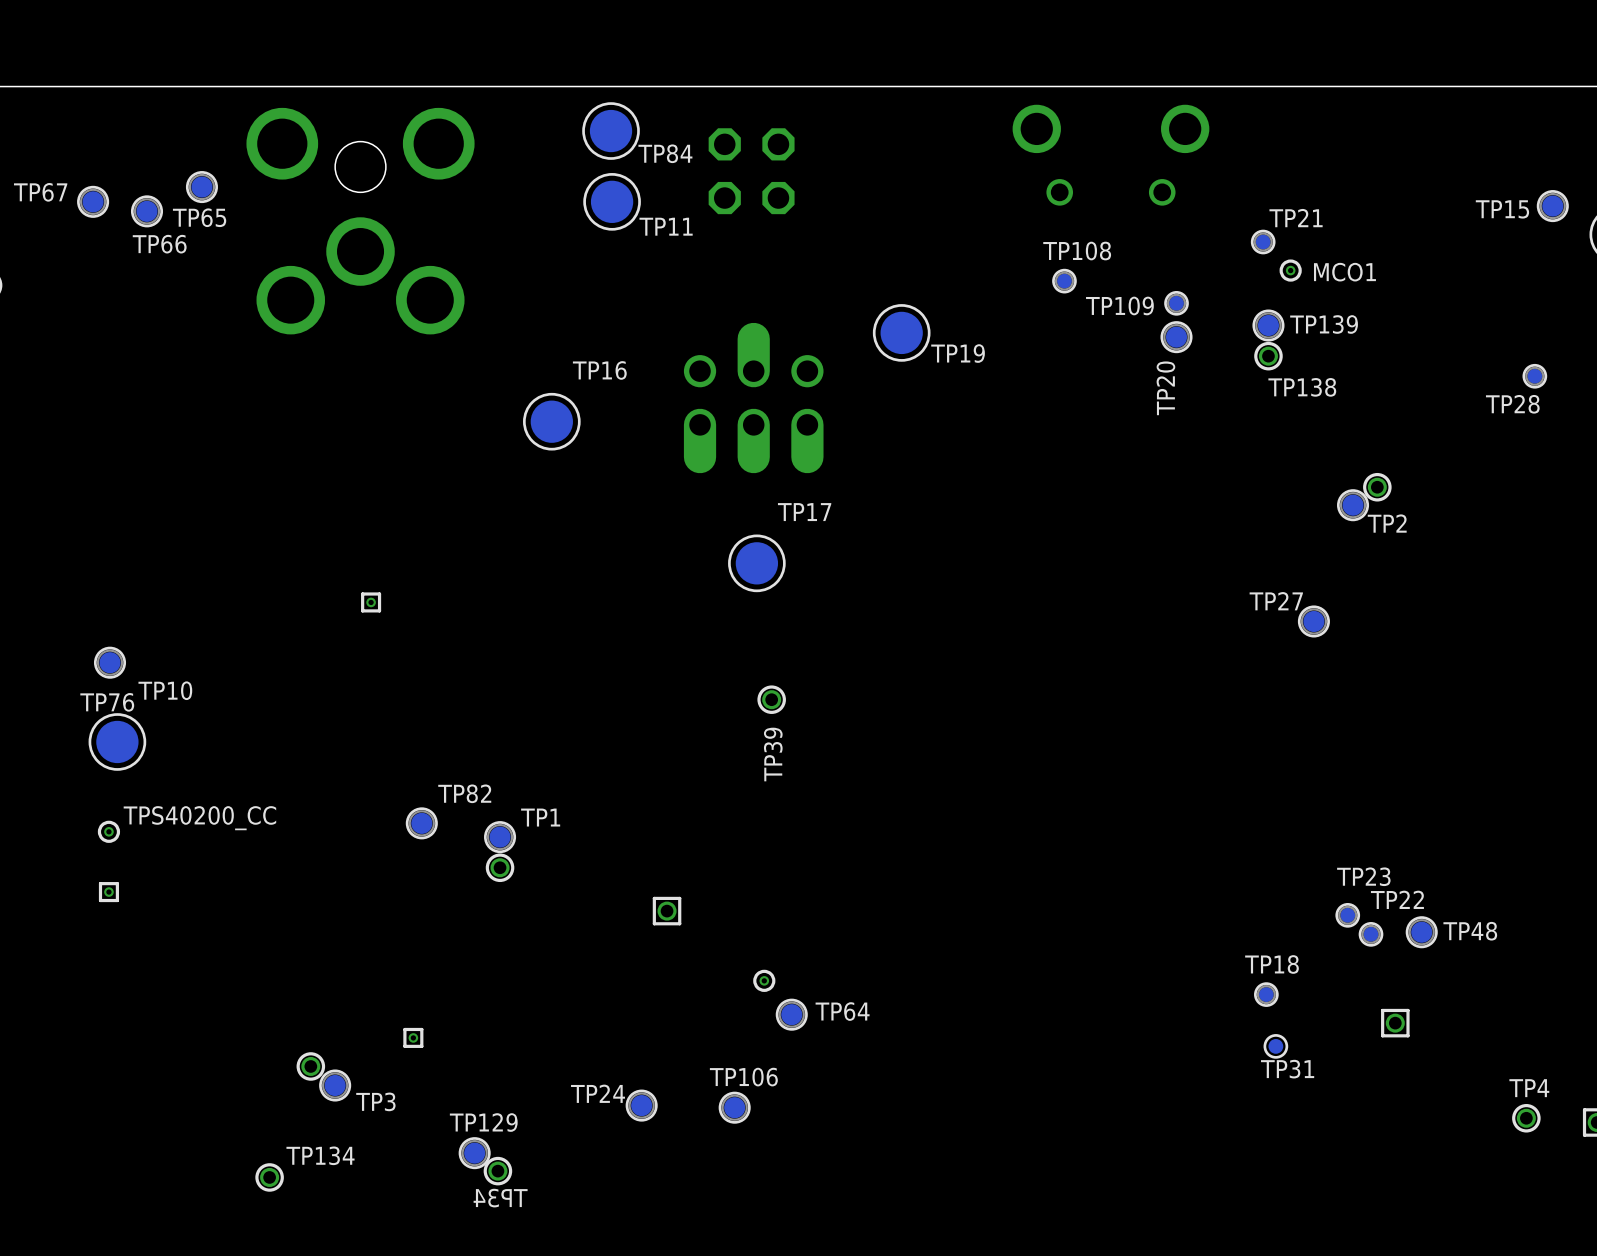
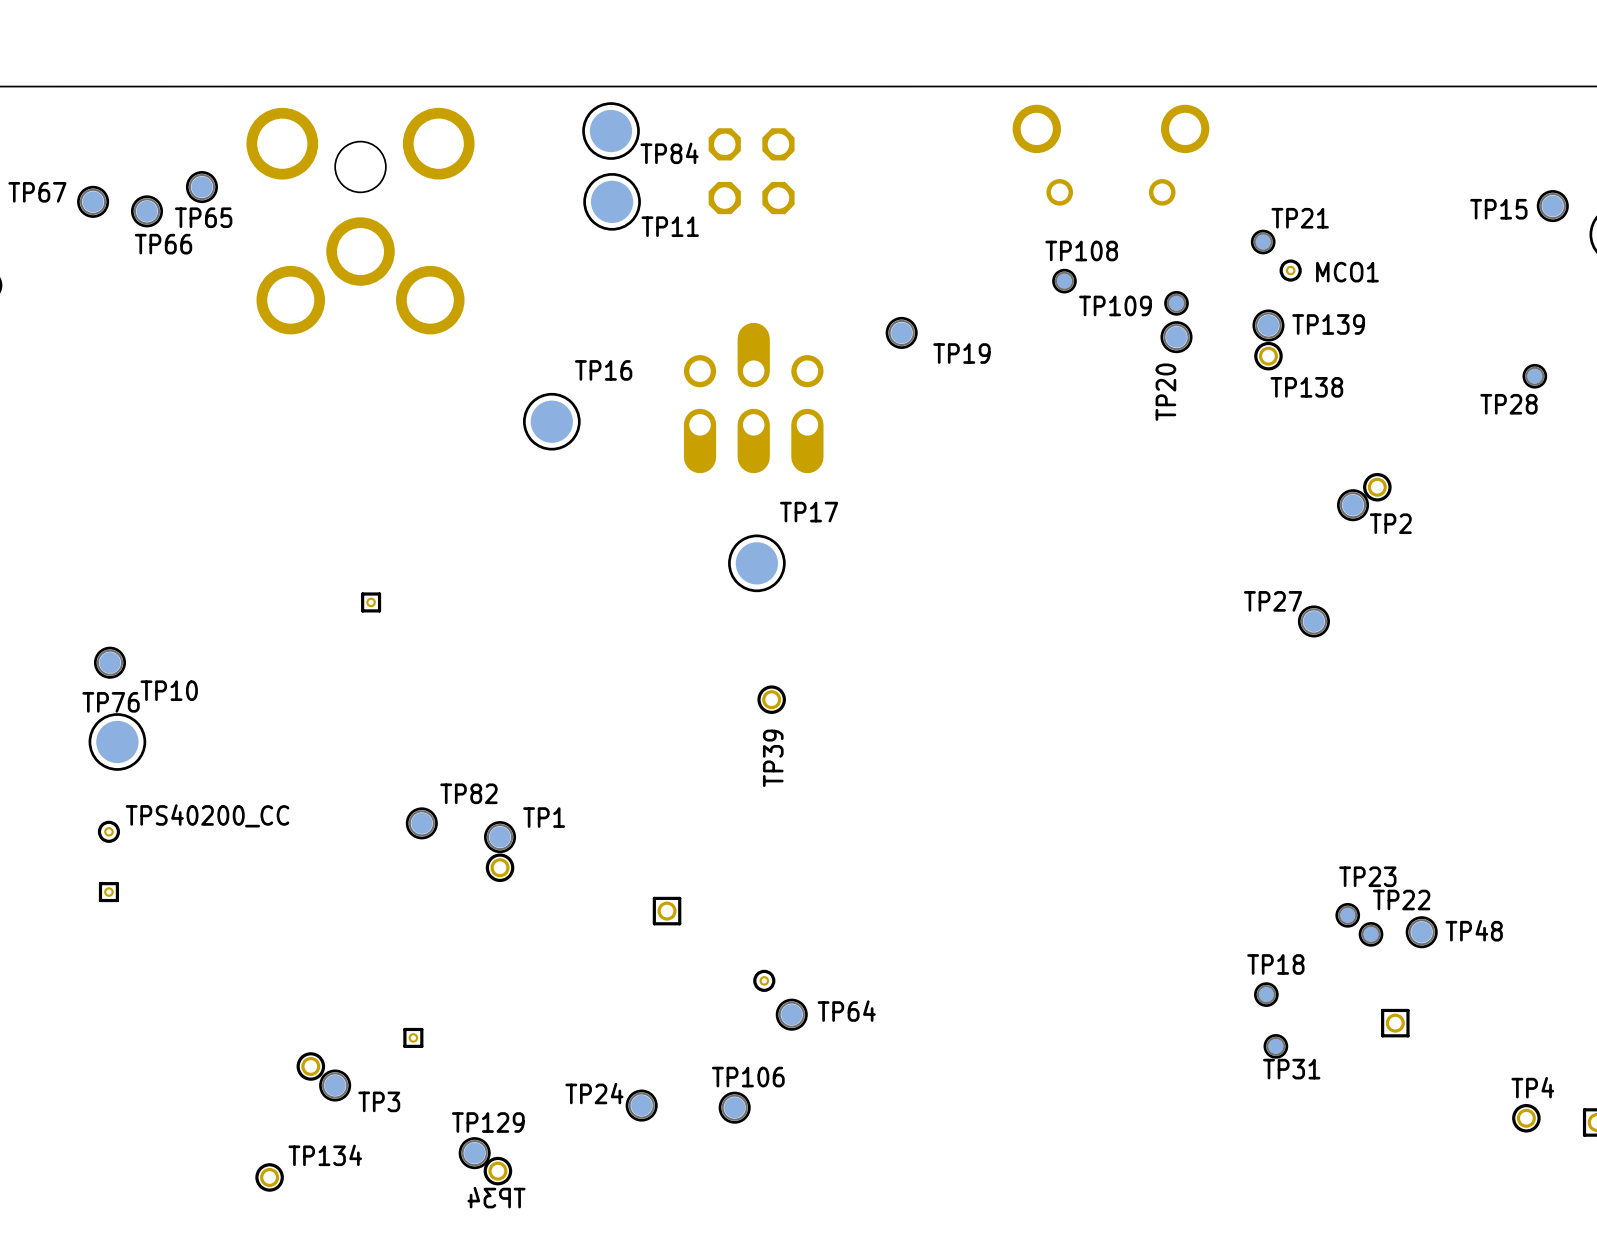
TP19 footprint: [872, 304, 931, 362] -> [885, 316, 918, 349]
TP31 footprint: [1263, 1034, 1289, 1059] -> [1263, 1034, 1289, 1059]

